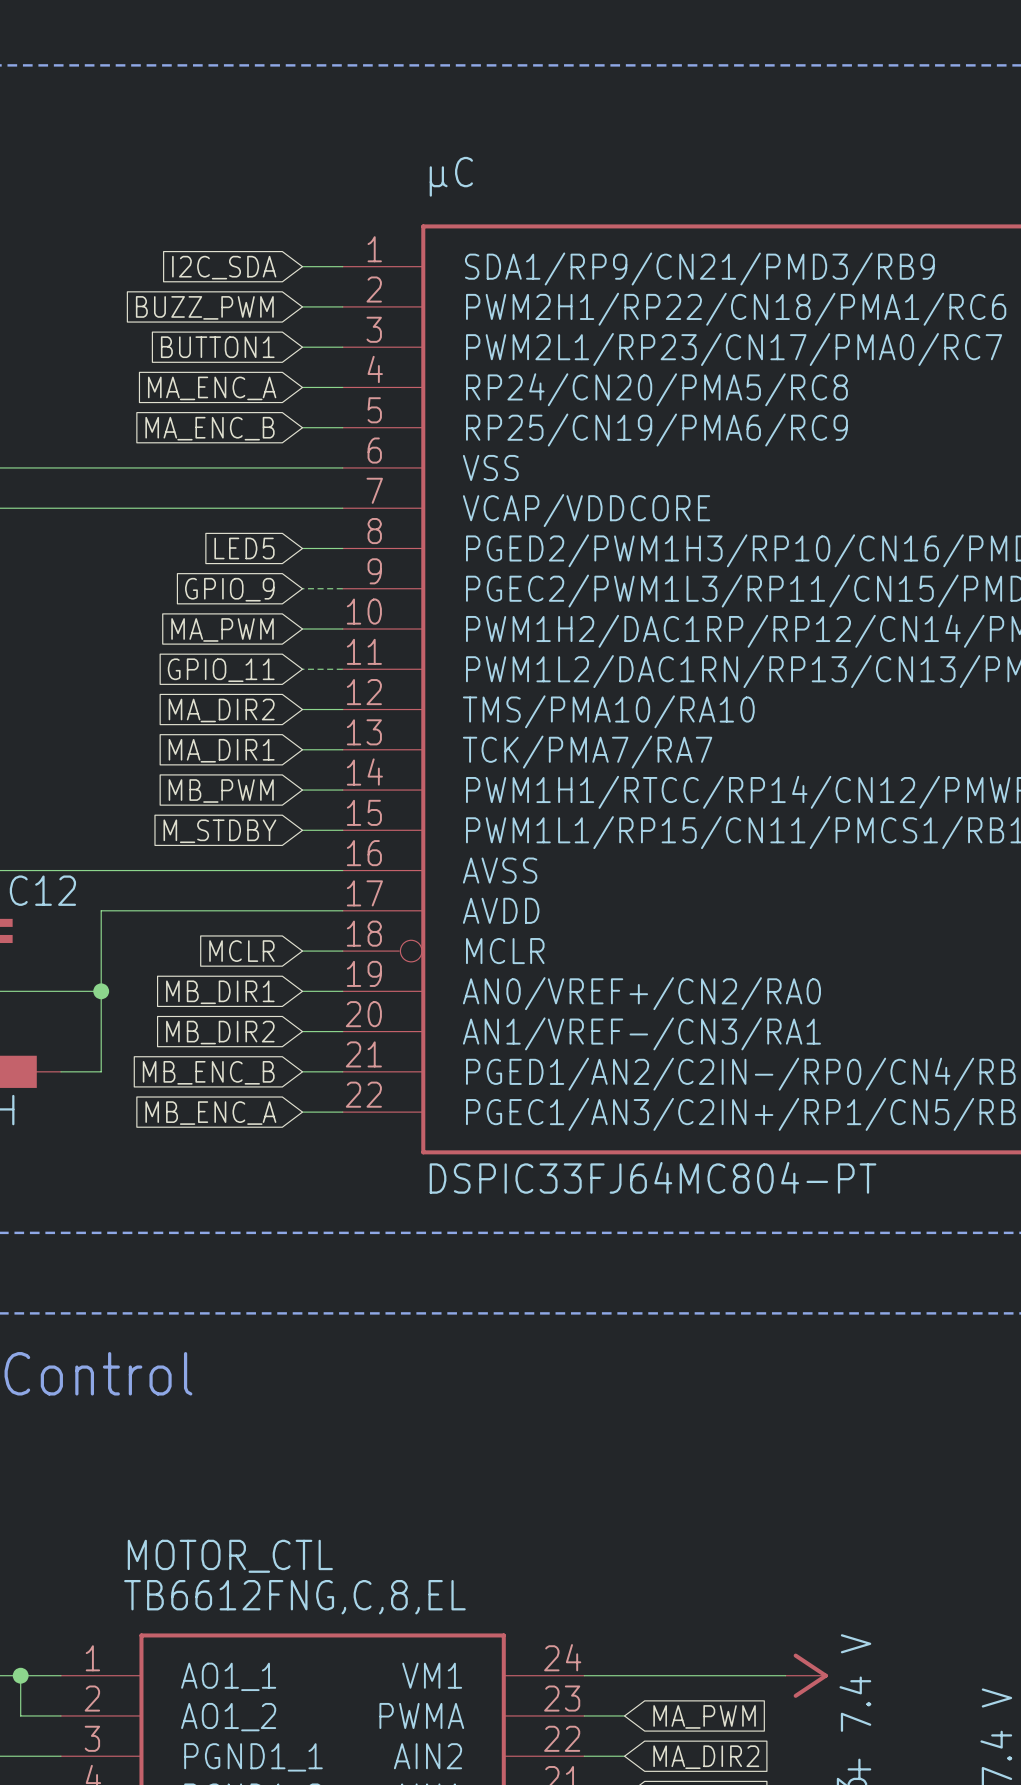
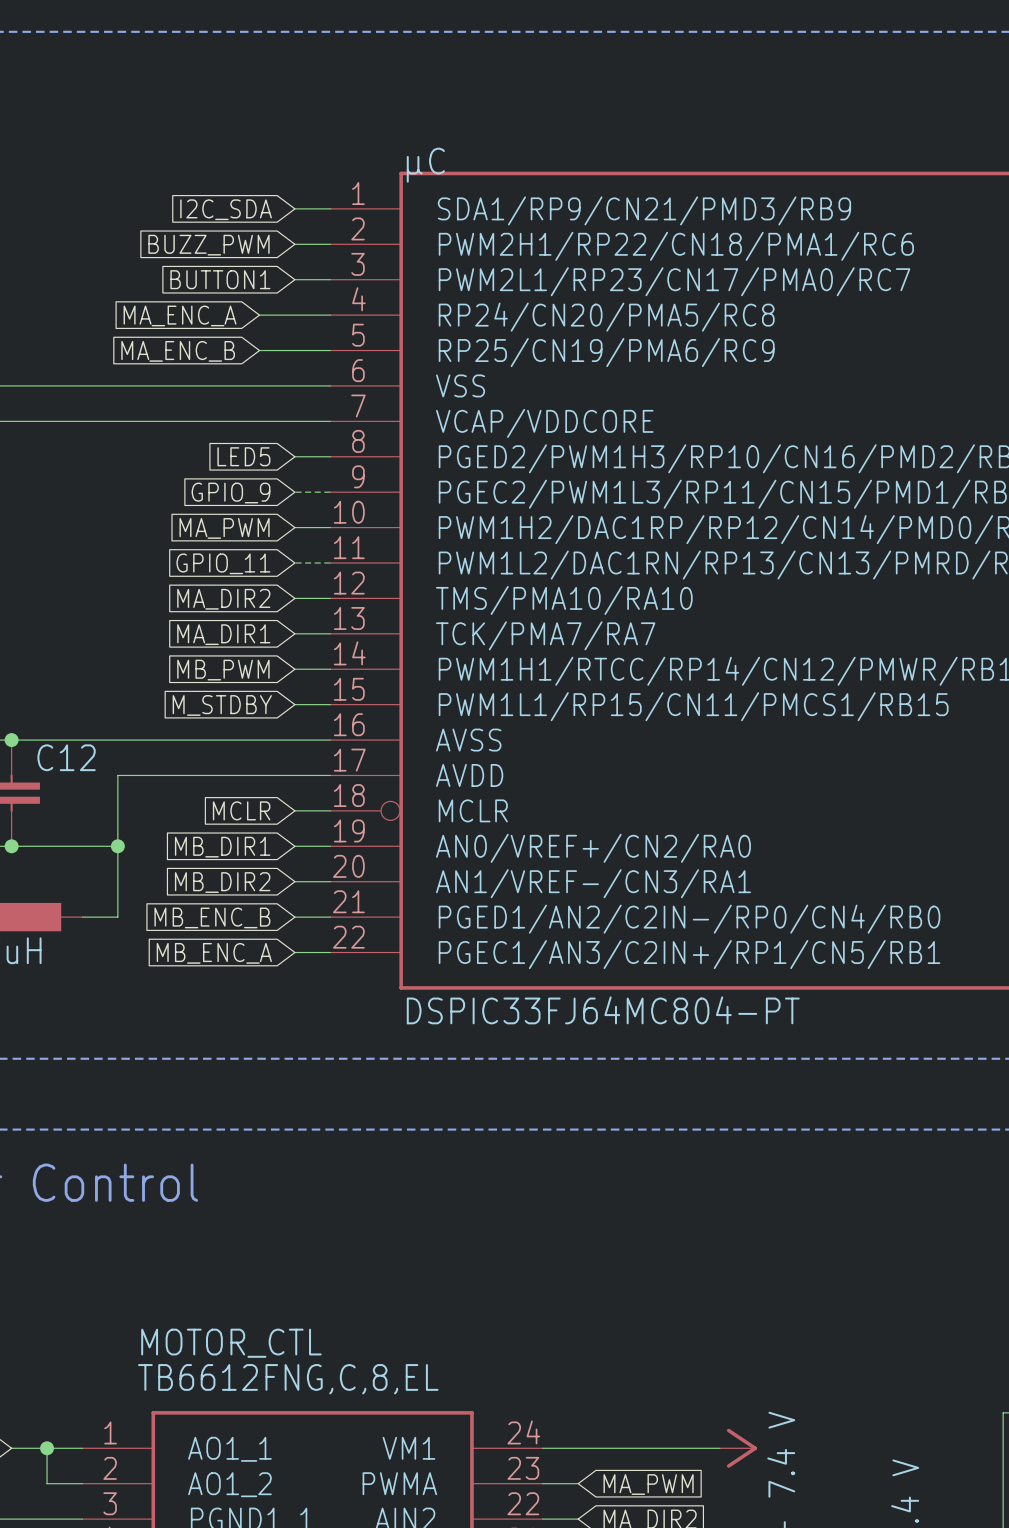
μC name position: μC (451, 176) -> μC (425, 165)
wire: none -> (259, 315) (294, 315)
global label position: MA_ENC_A (212, 388) -> MA_ENC_A (180, 315)
wire: none -> (259, 350) (294, 350)
global label position: MA_ENC_B (210, 428) -> MA_ENC_B (178, 351)

